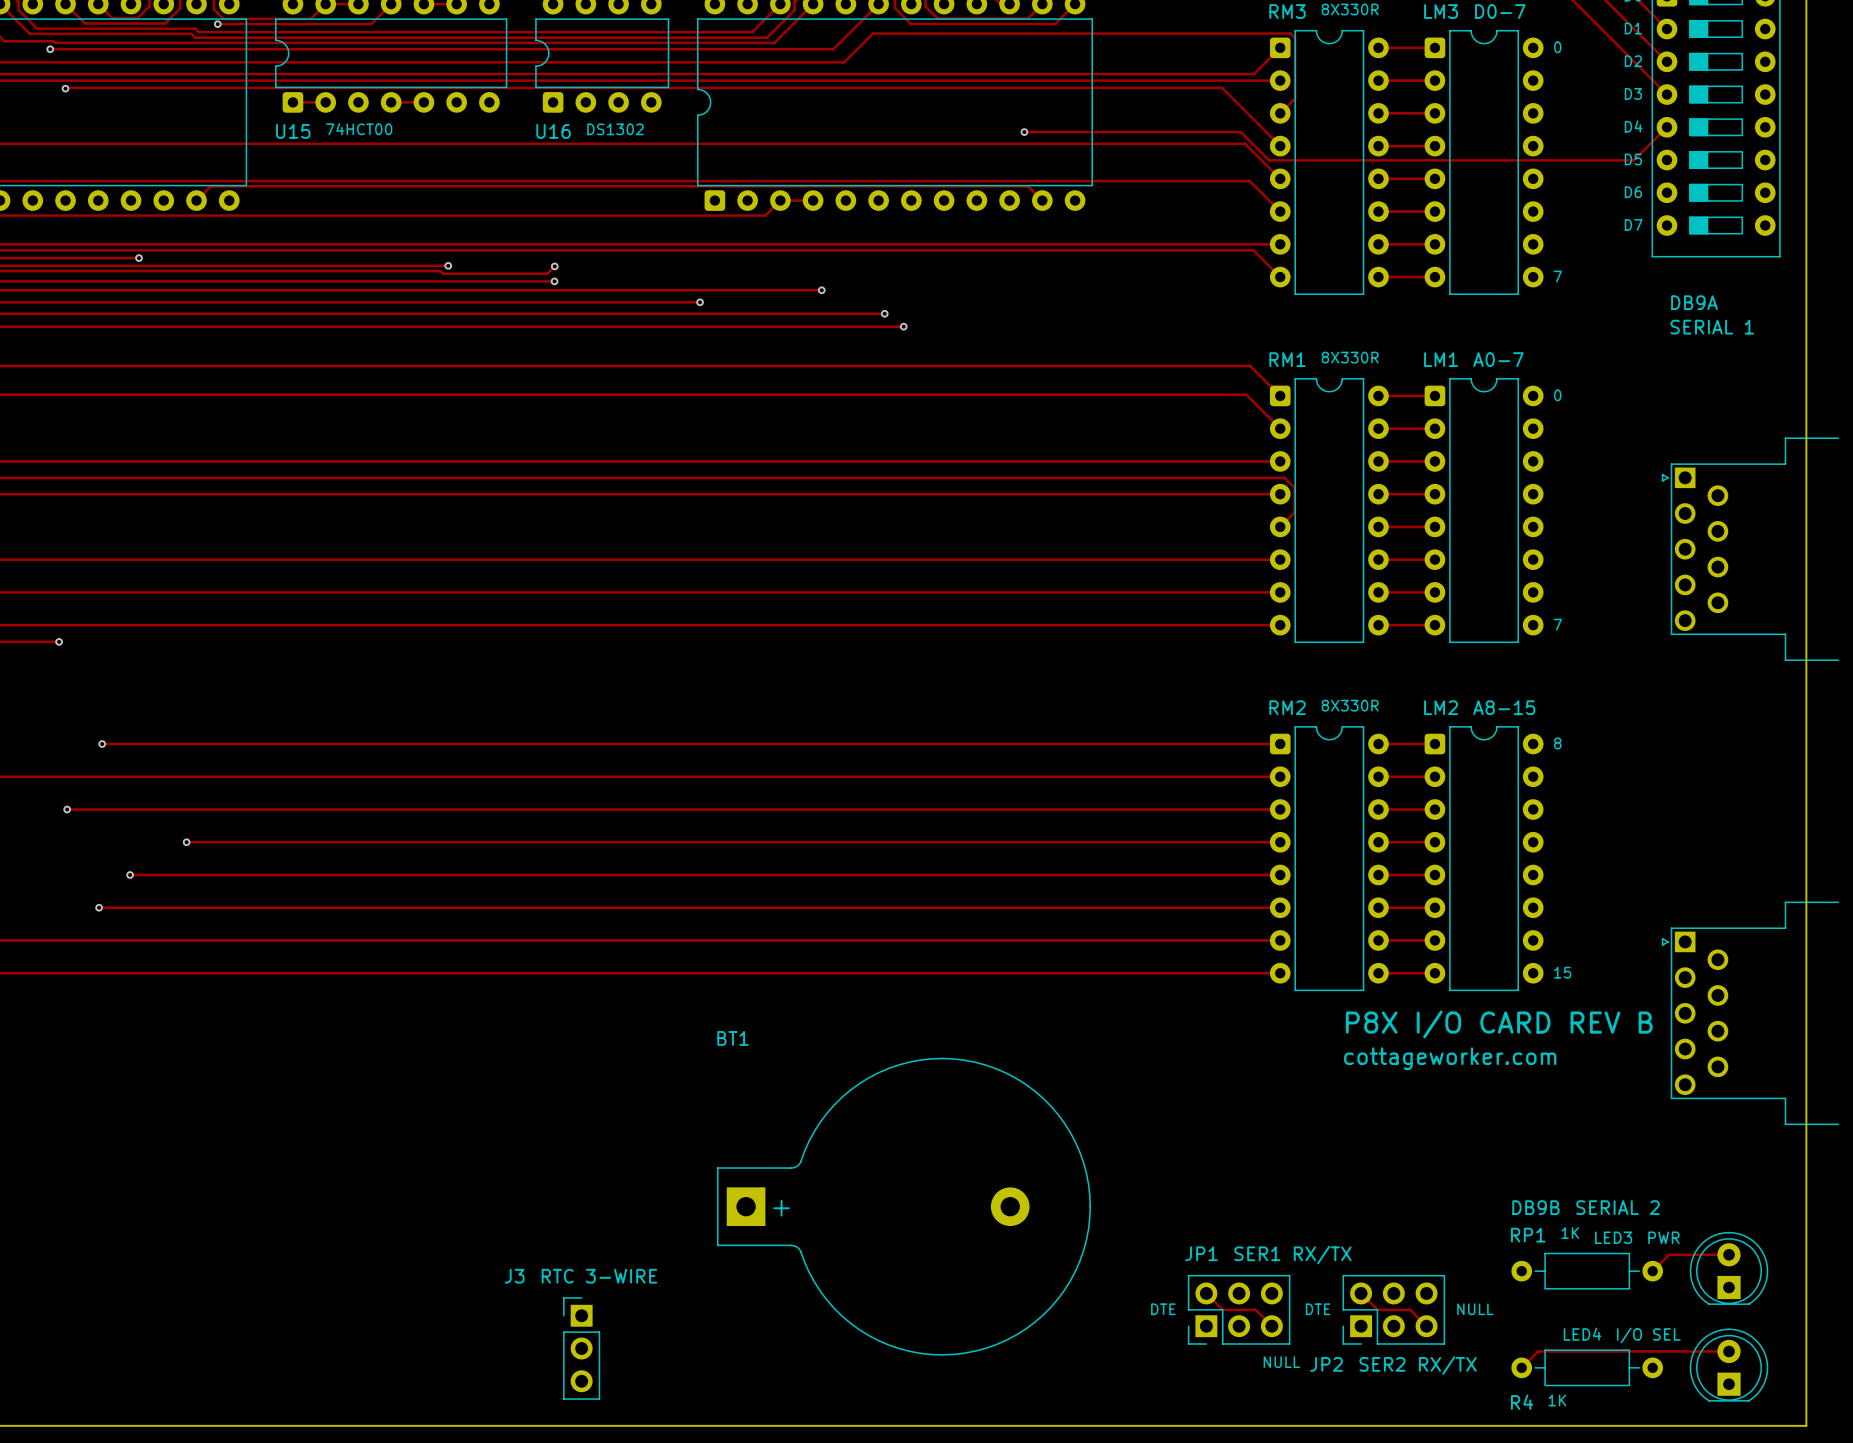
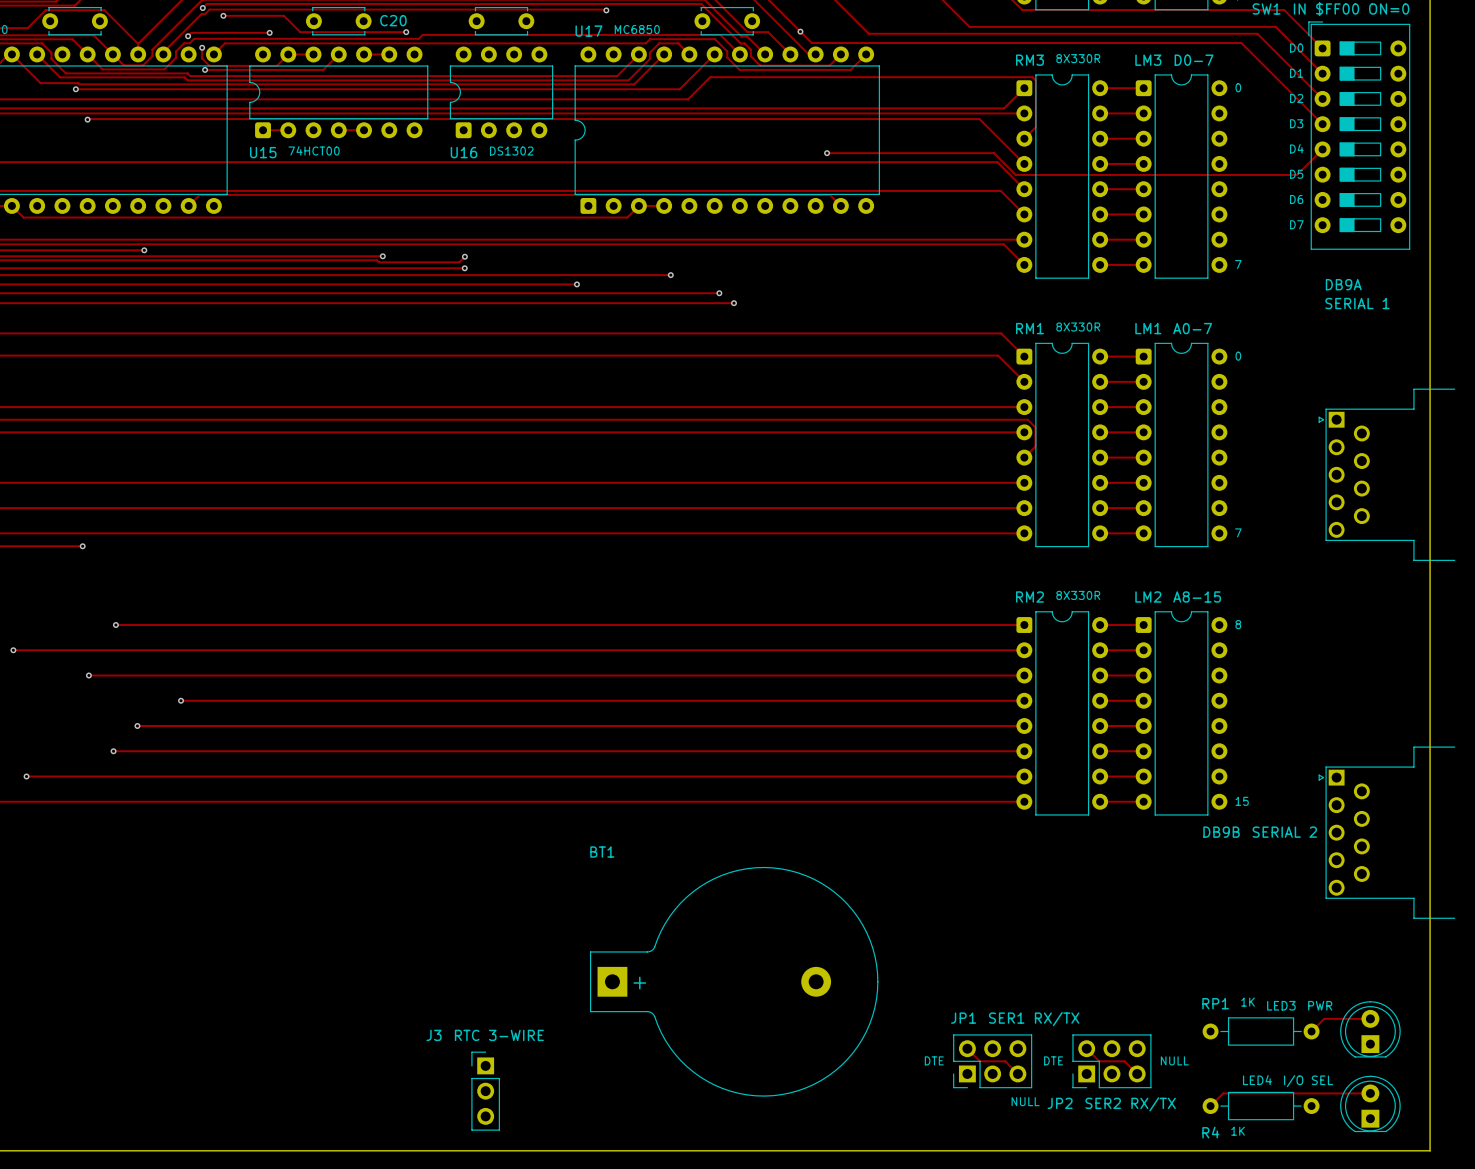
text: P8X I/O CARD REV B (1499, 1024) -> none
text: cottageworker.com (1450, 1058) -> none
DB9B name position: DB9B (1535, 1207) -> DB9B (1221, 832)
text position: SERIAL 2 (1617, 1207) -> SERIAL 2 (1284, 832)

